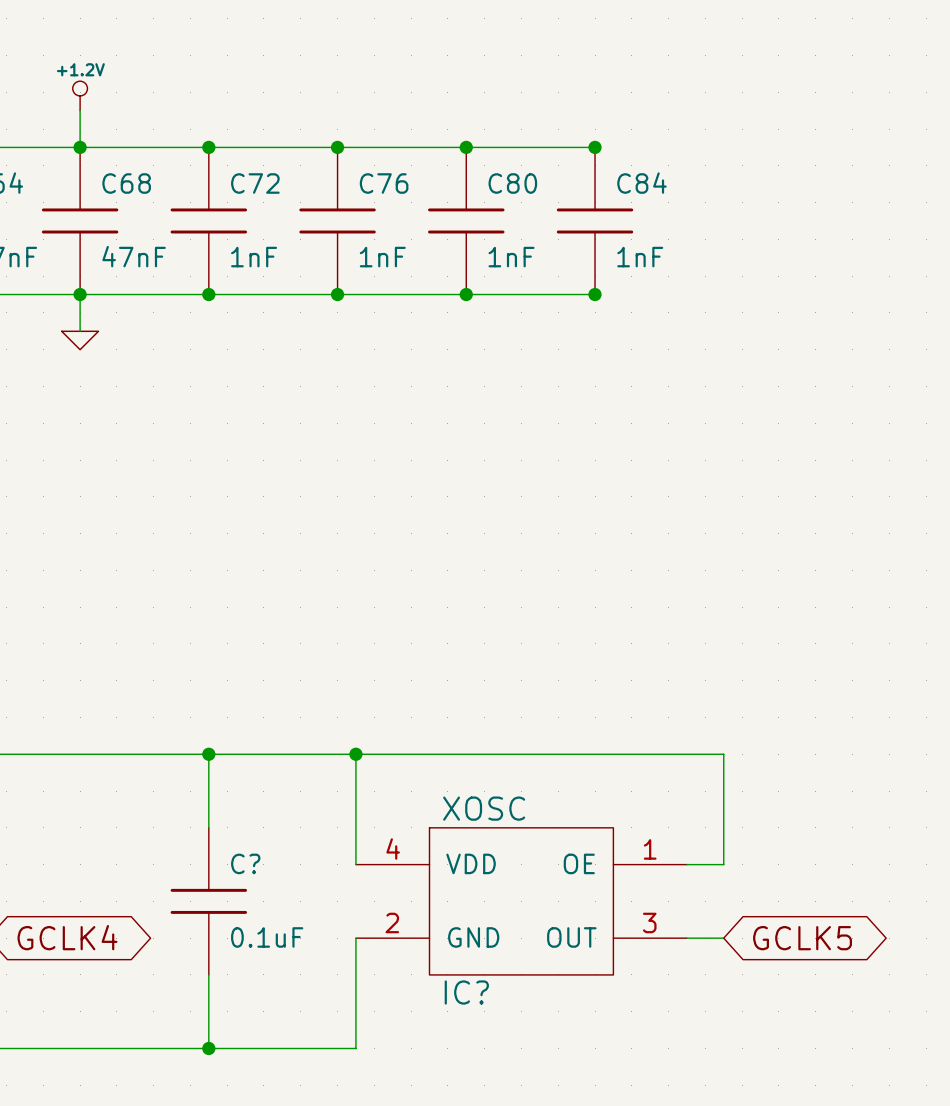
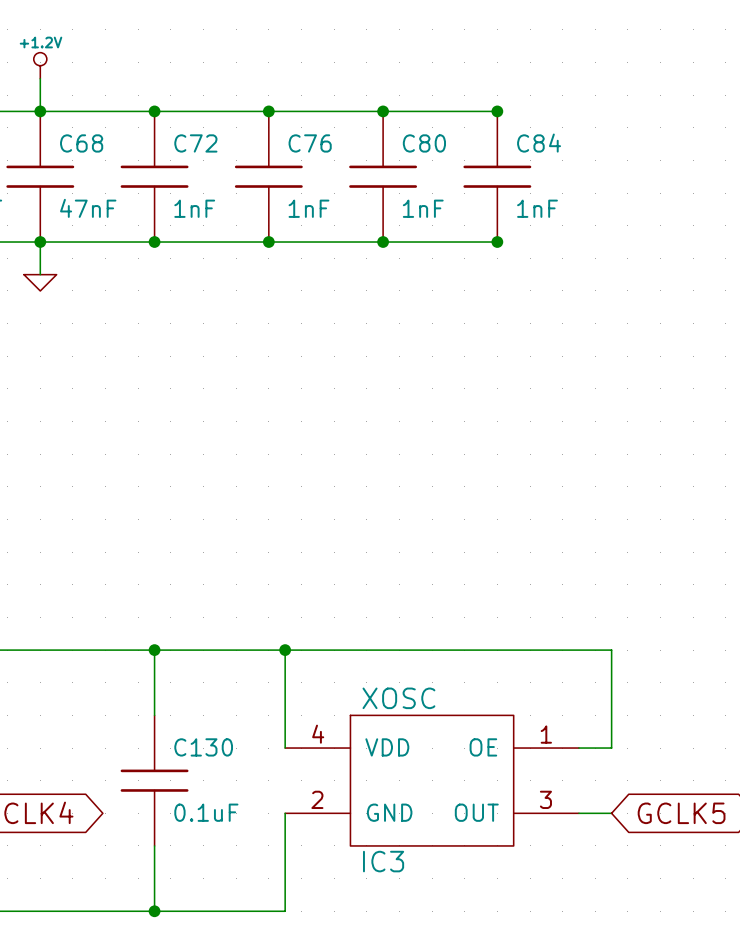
C? name: C? (245, 863) -> C130 (203, 747)
IC? name: IC? (466, 992) -> IC3 (383, 861)

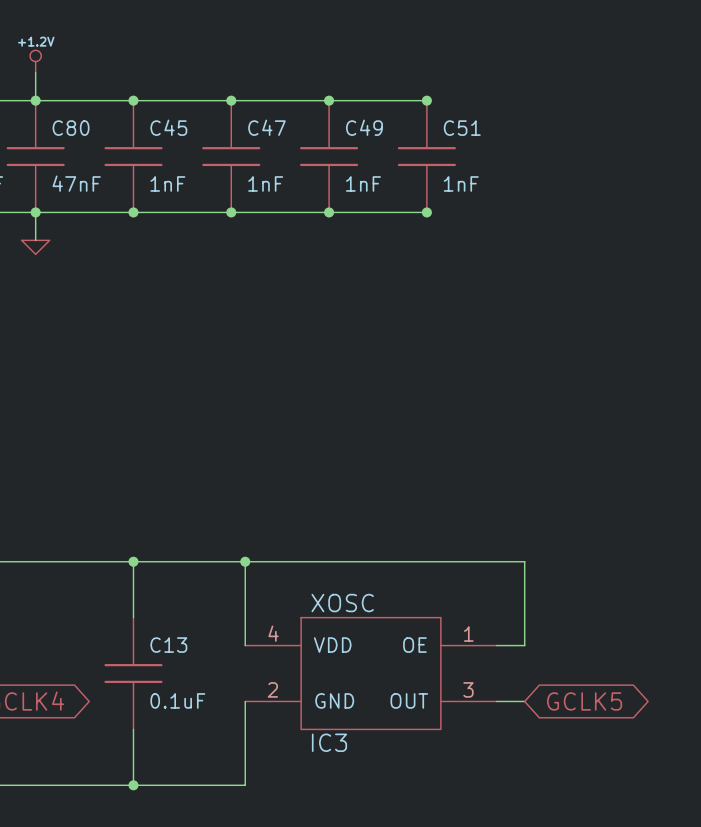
C68 name: C68 (81, 143) -> C80 (71, 128)
C72 name: C72 (195, 143) -> C45 (168, 127)
C76 name: C76 (310, 143) -> C47 (266, 127)
C80 name: C80 (424, 143) -> C49 (364, 127)
C84 name: C84 (539, 143) -> C51 (462, 128)
C130 name: C130 (203, 747) -> C13 (168, 645)

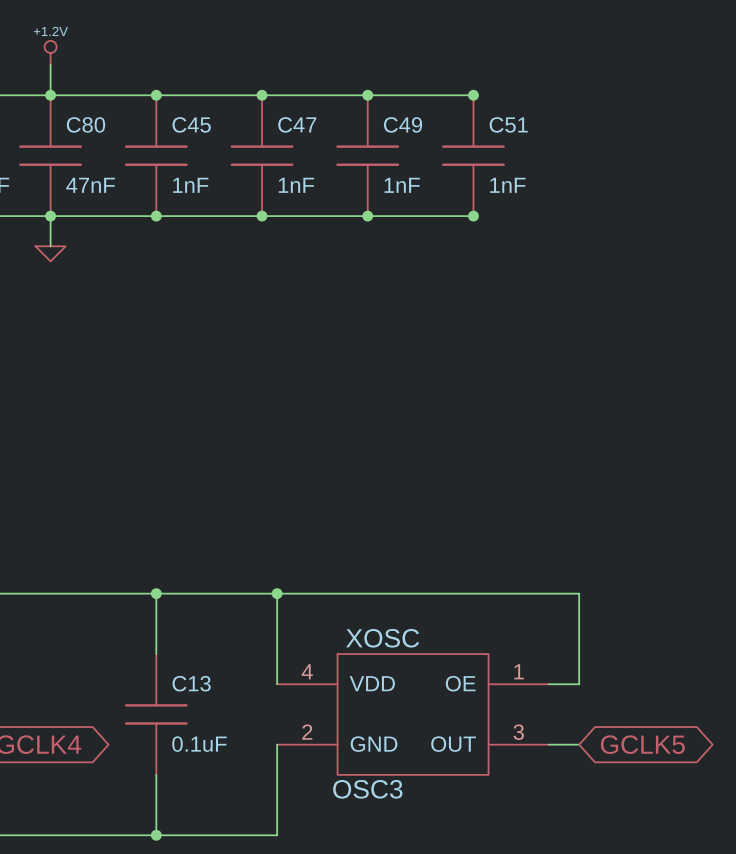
IC3 name: IC3 (329, 742) -> OSC3 (367, 789)

